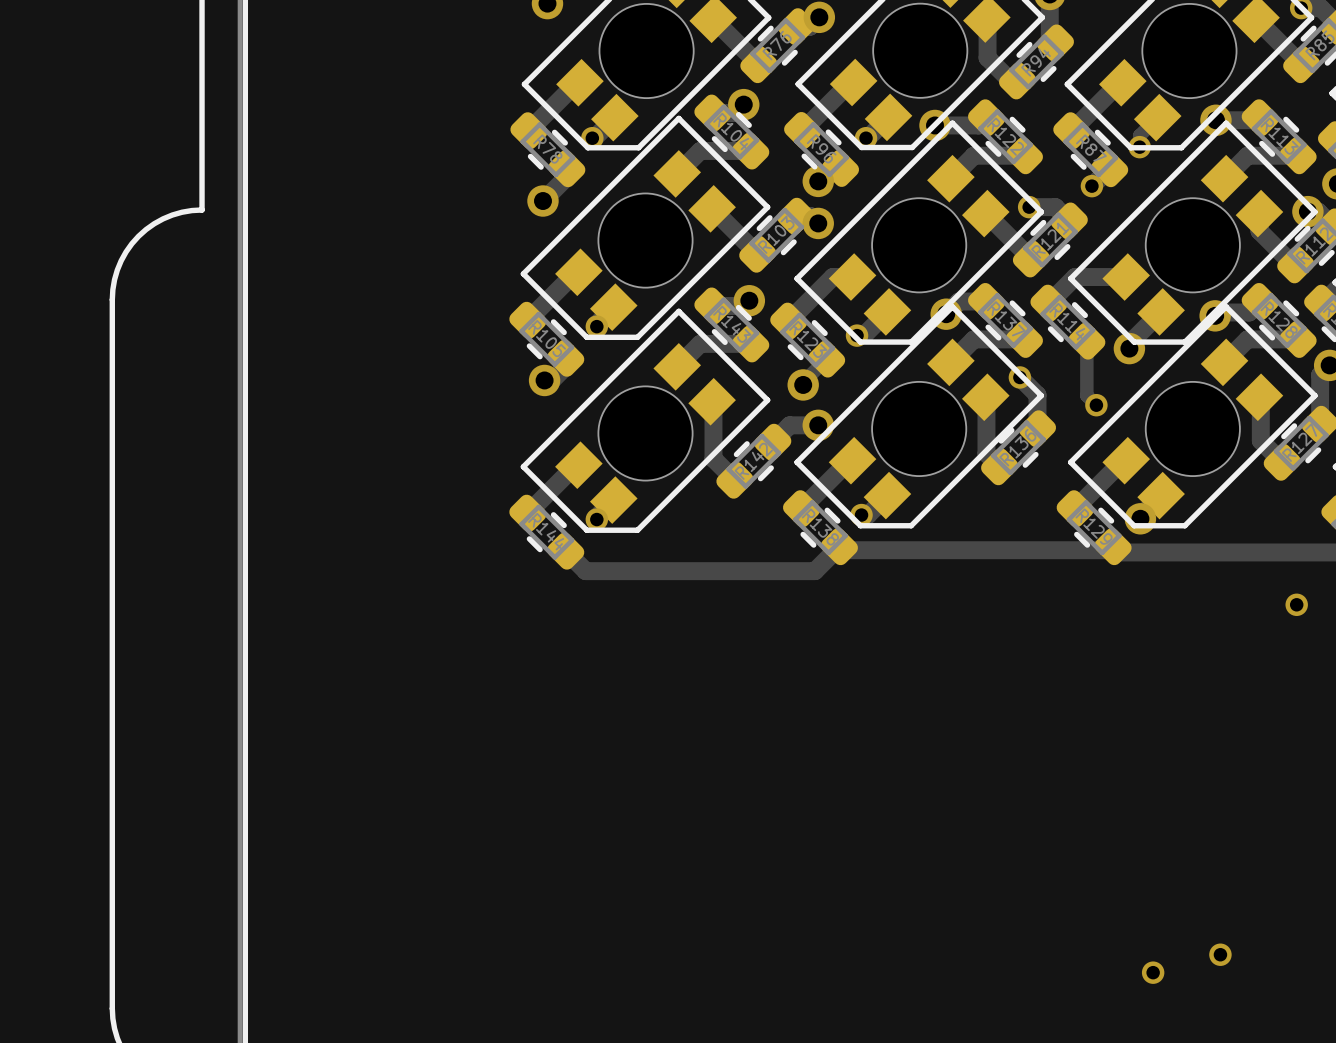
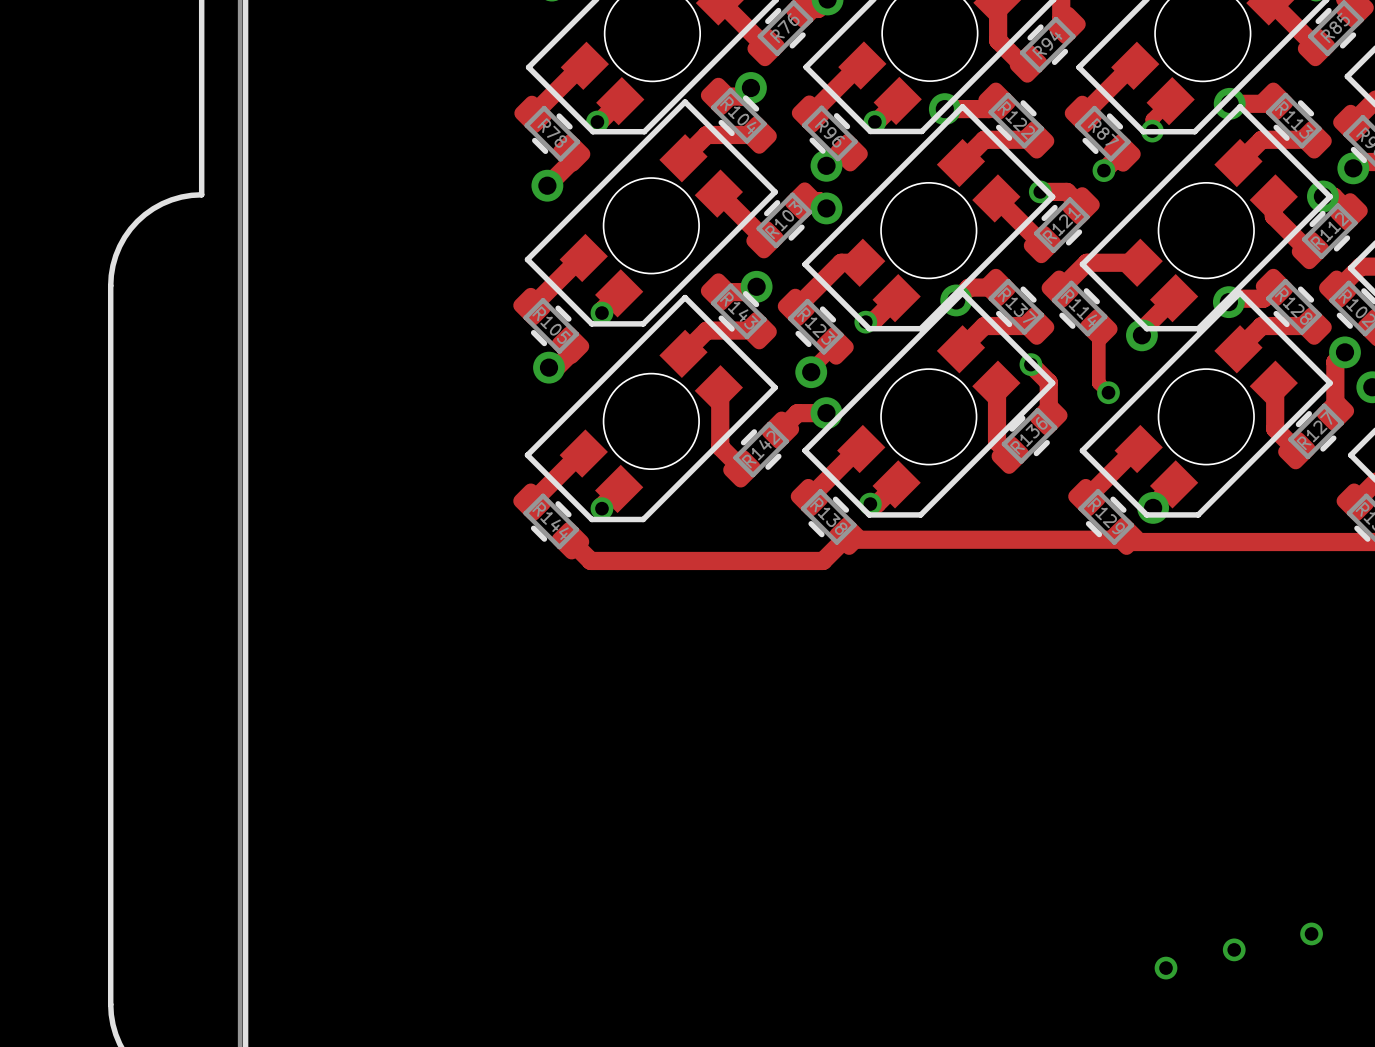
via: (1296, 604) -> none
via: none -> (1311, 933)

